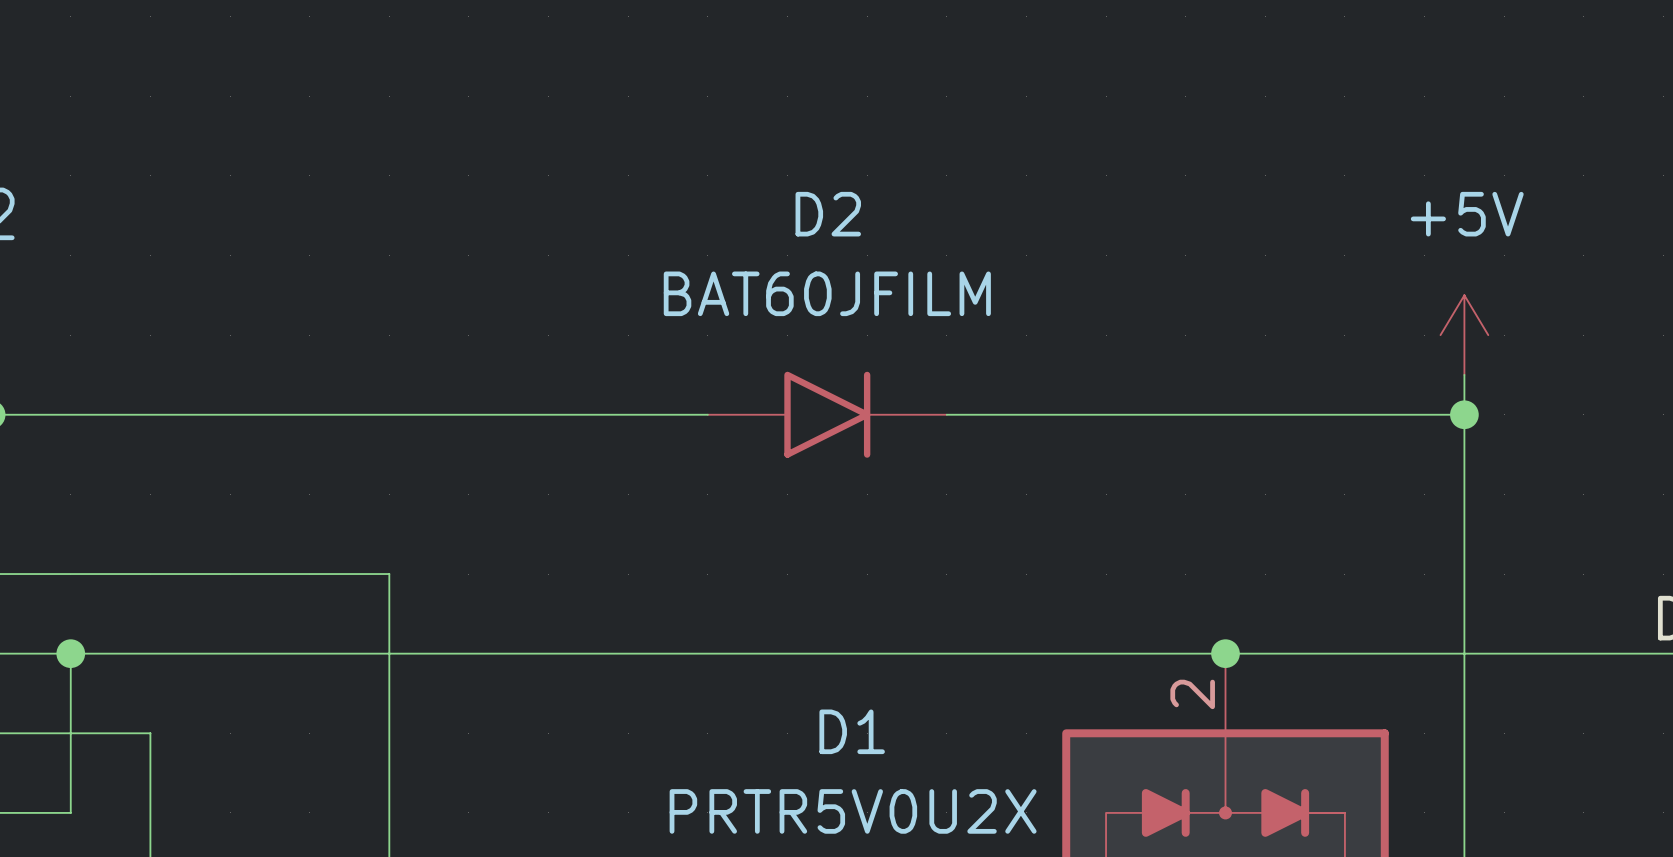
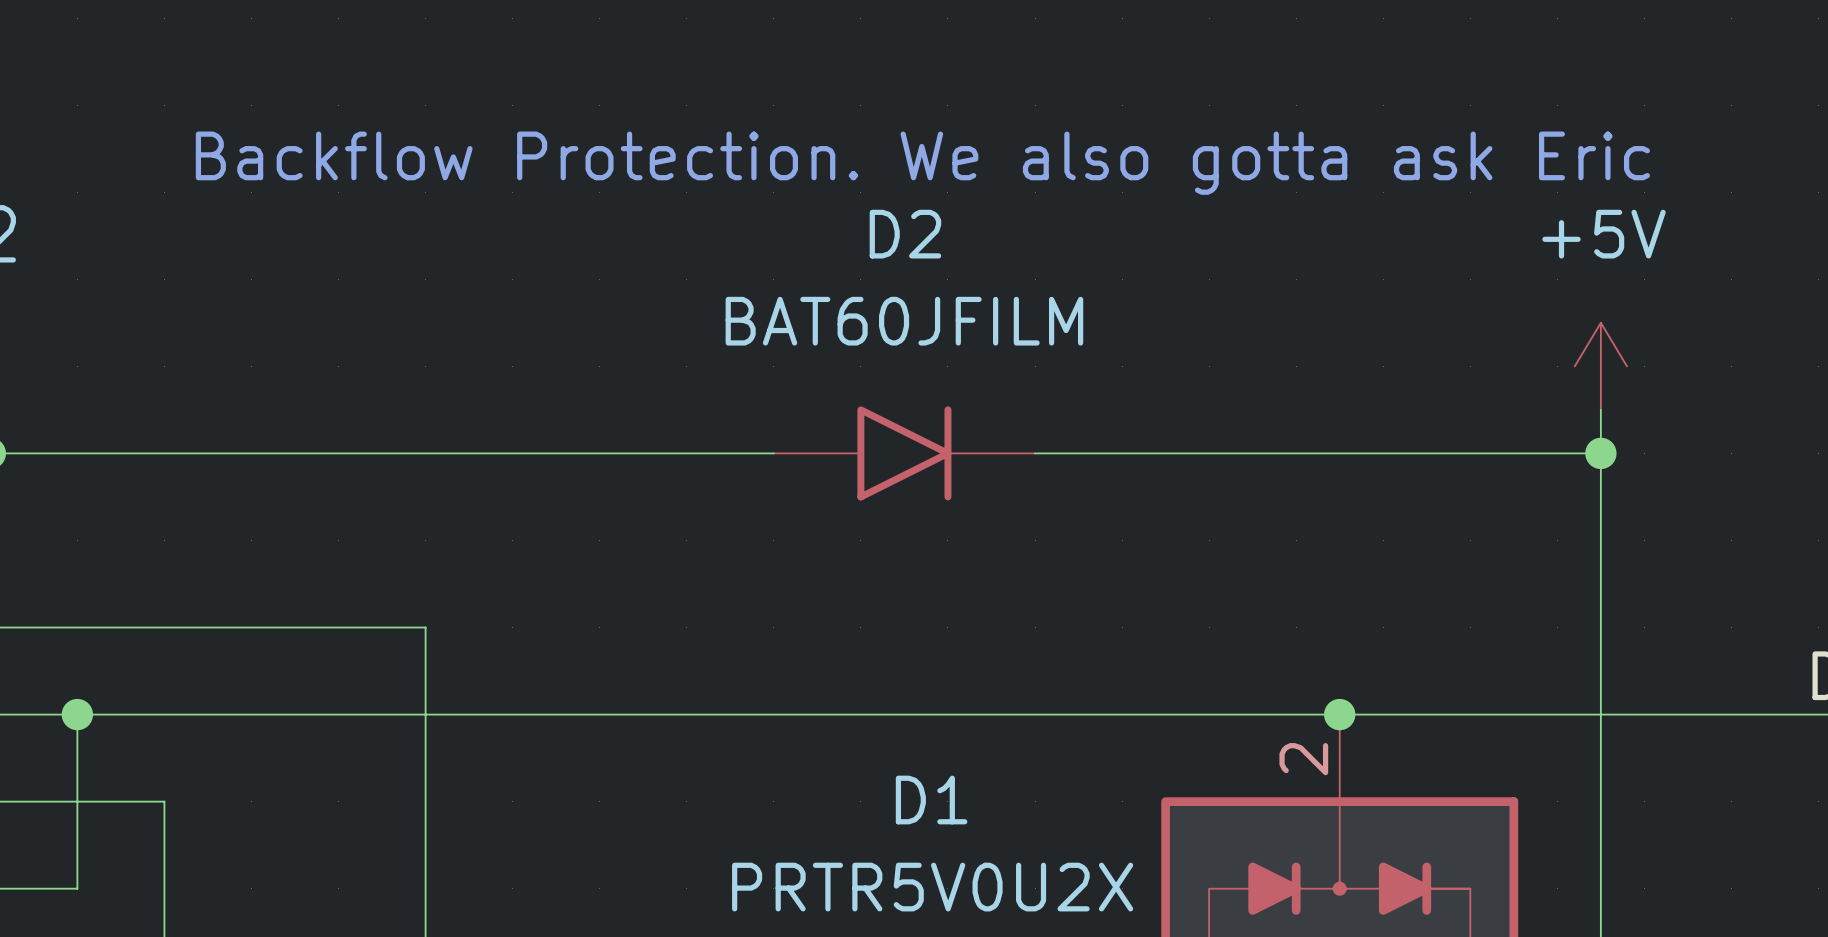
text: none -> Backflow Protection. We also gotta ask Eric (922, 163)

